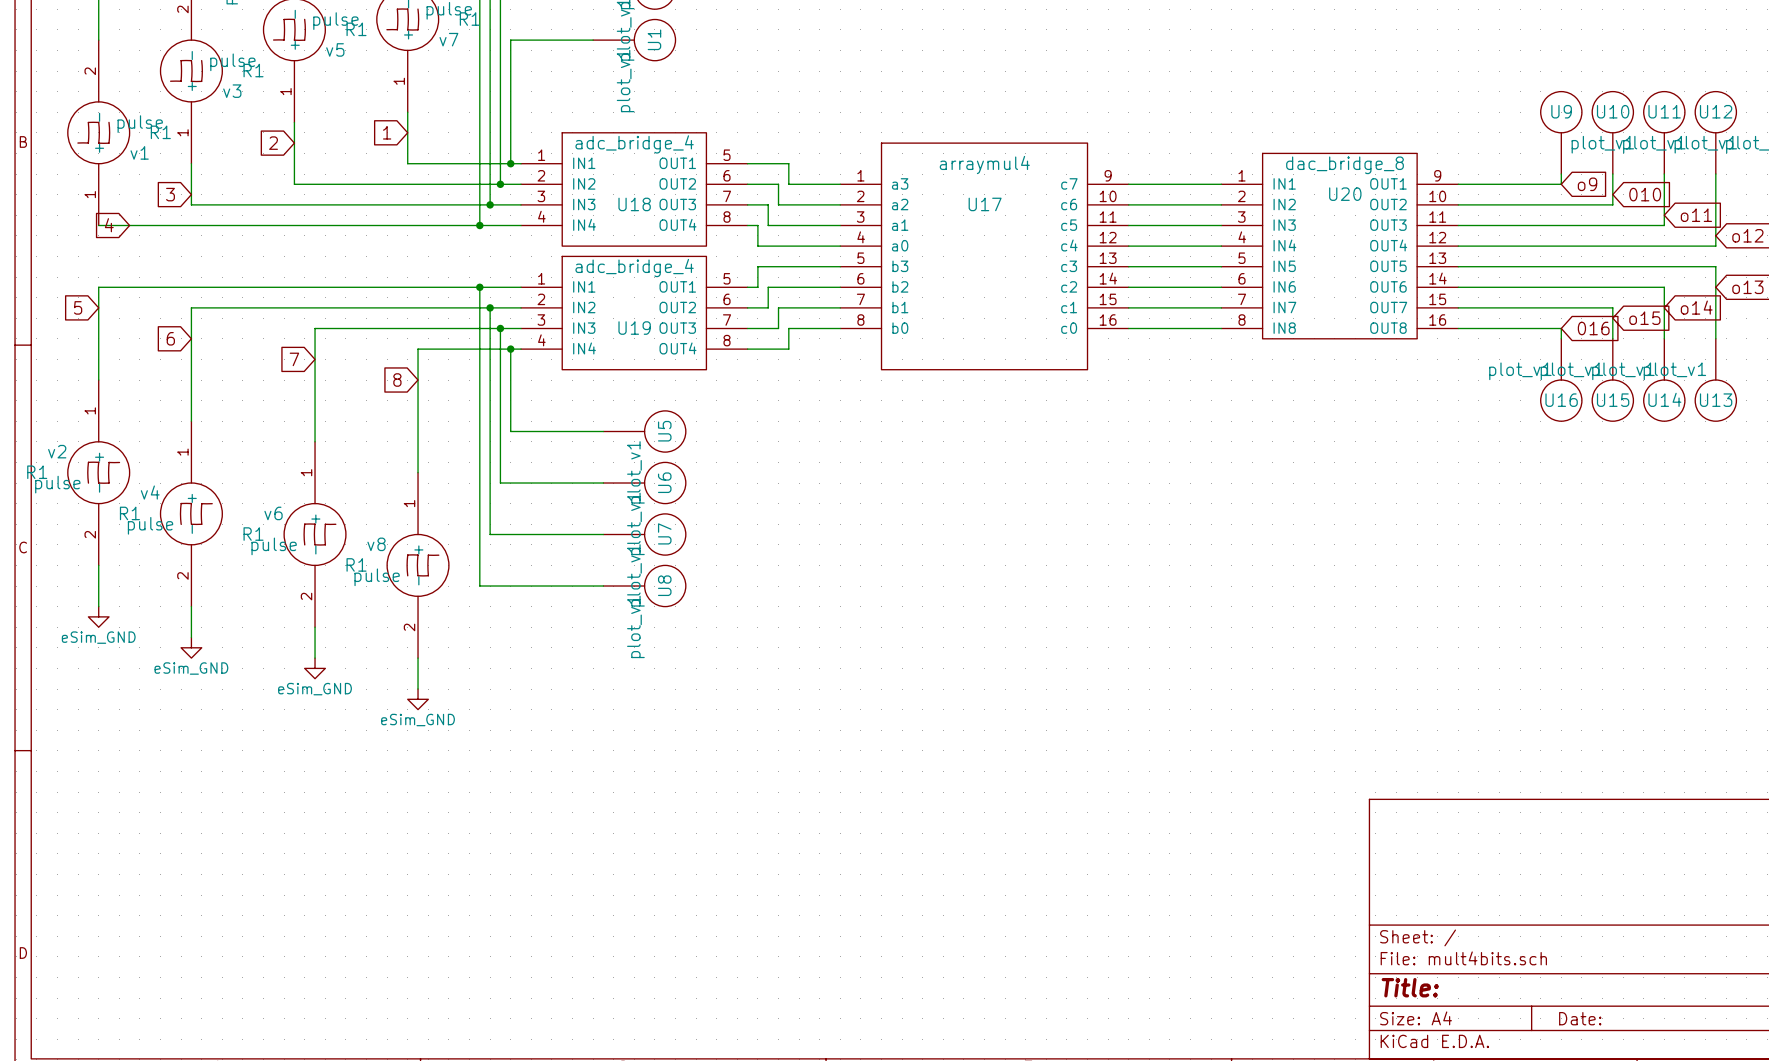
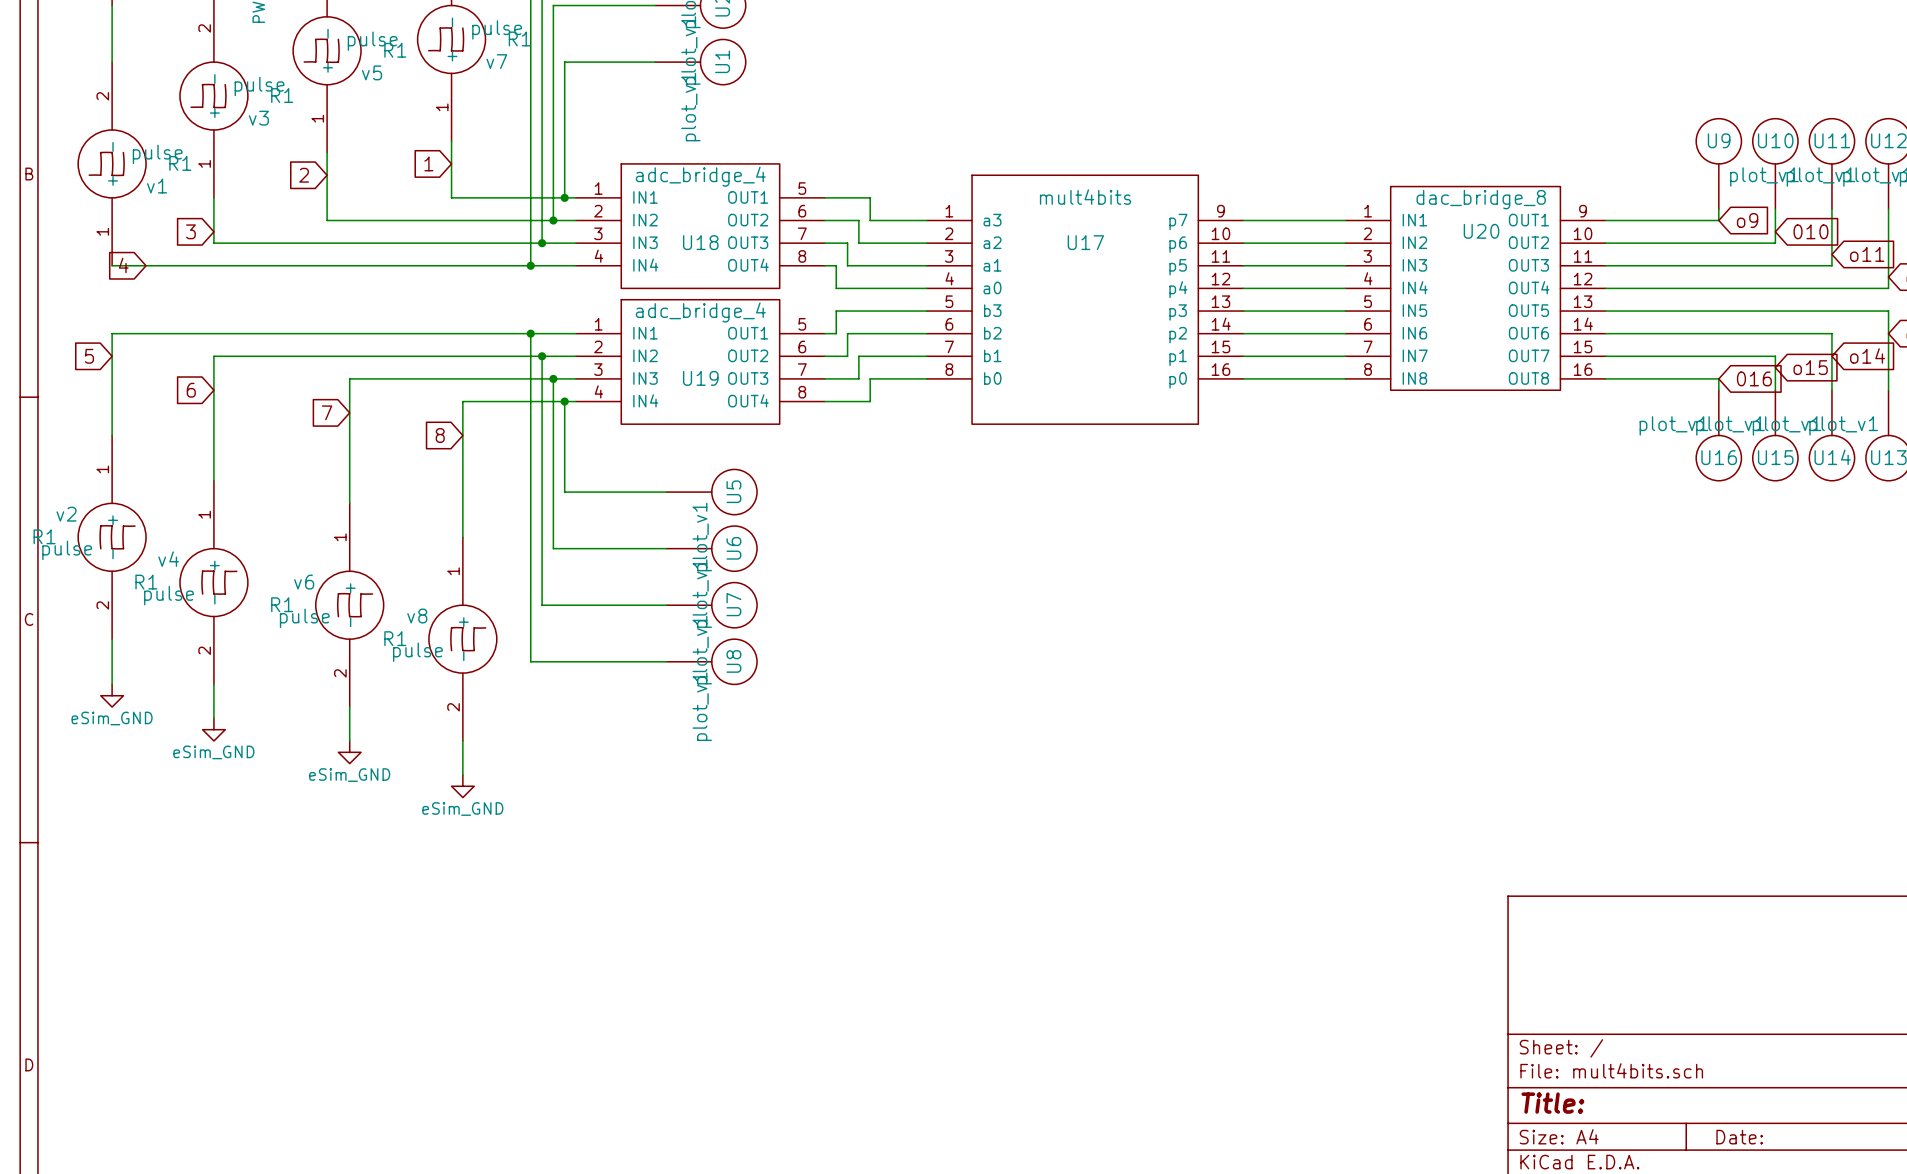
U17 value: arraymul4 (984, 165) -> mult4bits (1085, 197)
U17 pin name: c7 (1069, 183) -> p7 (1178, 221)
U17 pin name: c6 (1069, 204) -> p6 (1178, 244)
U17 pin name: c5 (1069, 225) -> p5 (1178, 267)
U17 pin name: c4 (1069, 245) -> p4 (1178, 289)
U17 pin name: c3 (1069, 266) -> p3 (1178, 312)
U17 pin name: c2 (1069, 286) -> p2 (1178, 335)
U17 pin name: c1 (1069, 307) -> p1 (1178, 357)
U17 pin name: c0 (1069, 328) -> p0 (1178, 380)

